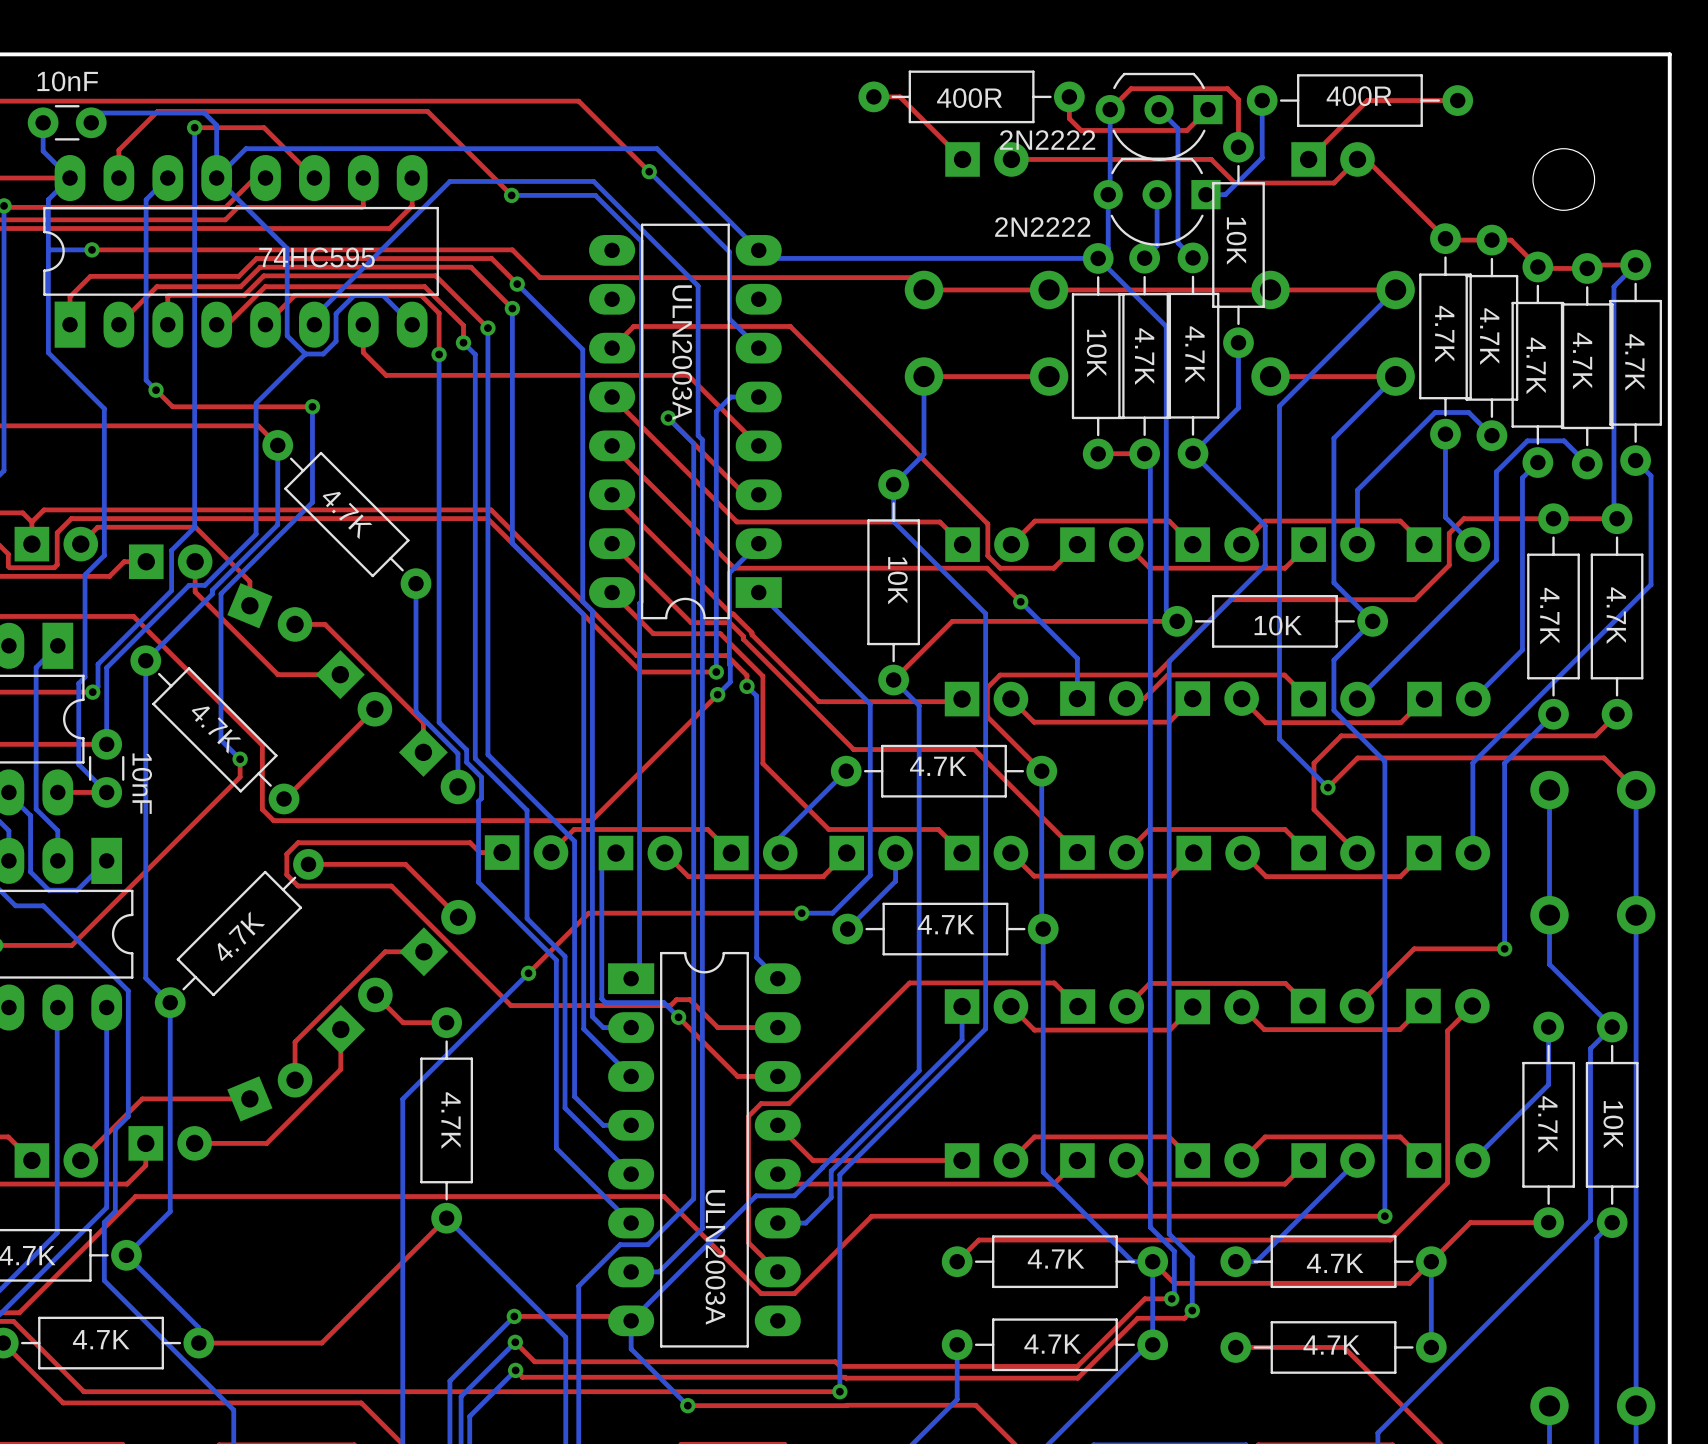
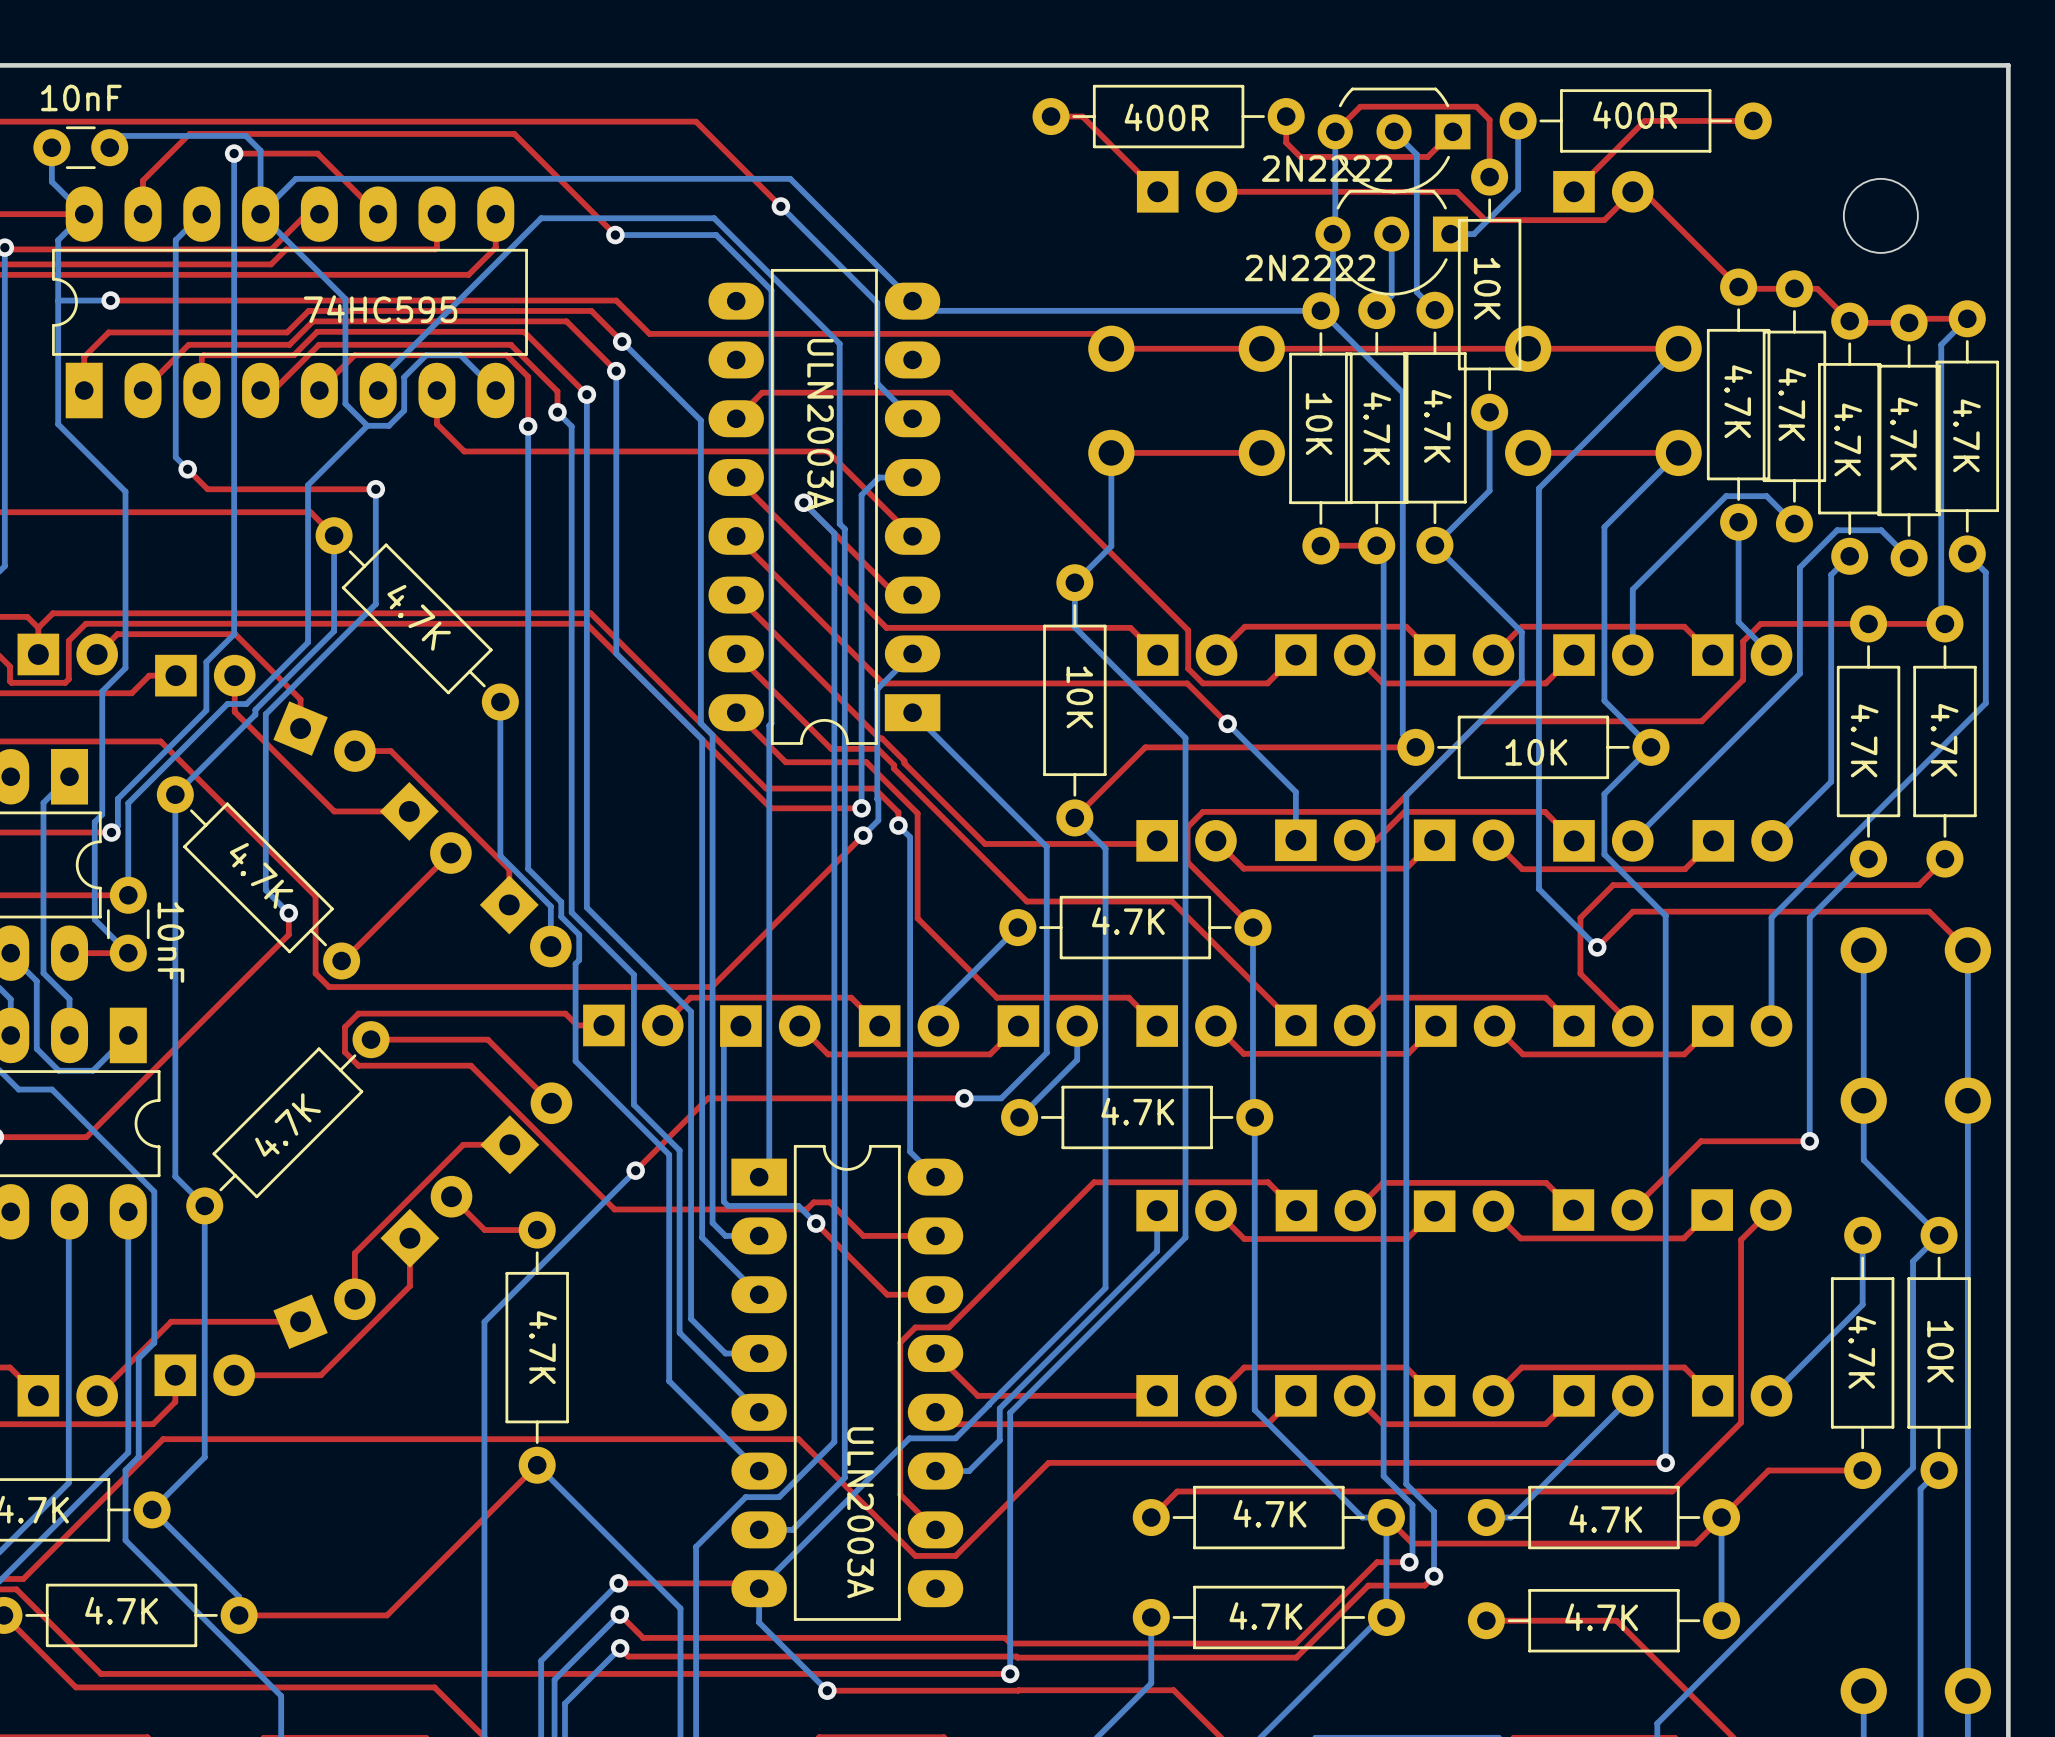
part value position: 2N2222 (1047, 140) -> 2N2222 (1327, 168)
part value position: 2N2222 (1042, 227) -> 2N2222 (1310, 267)

